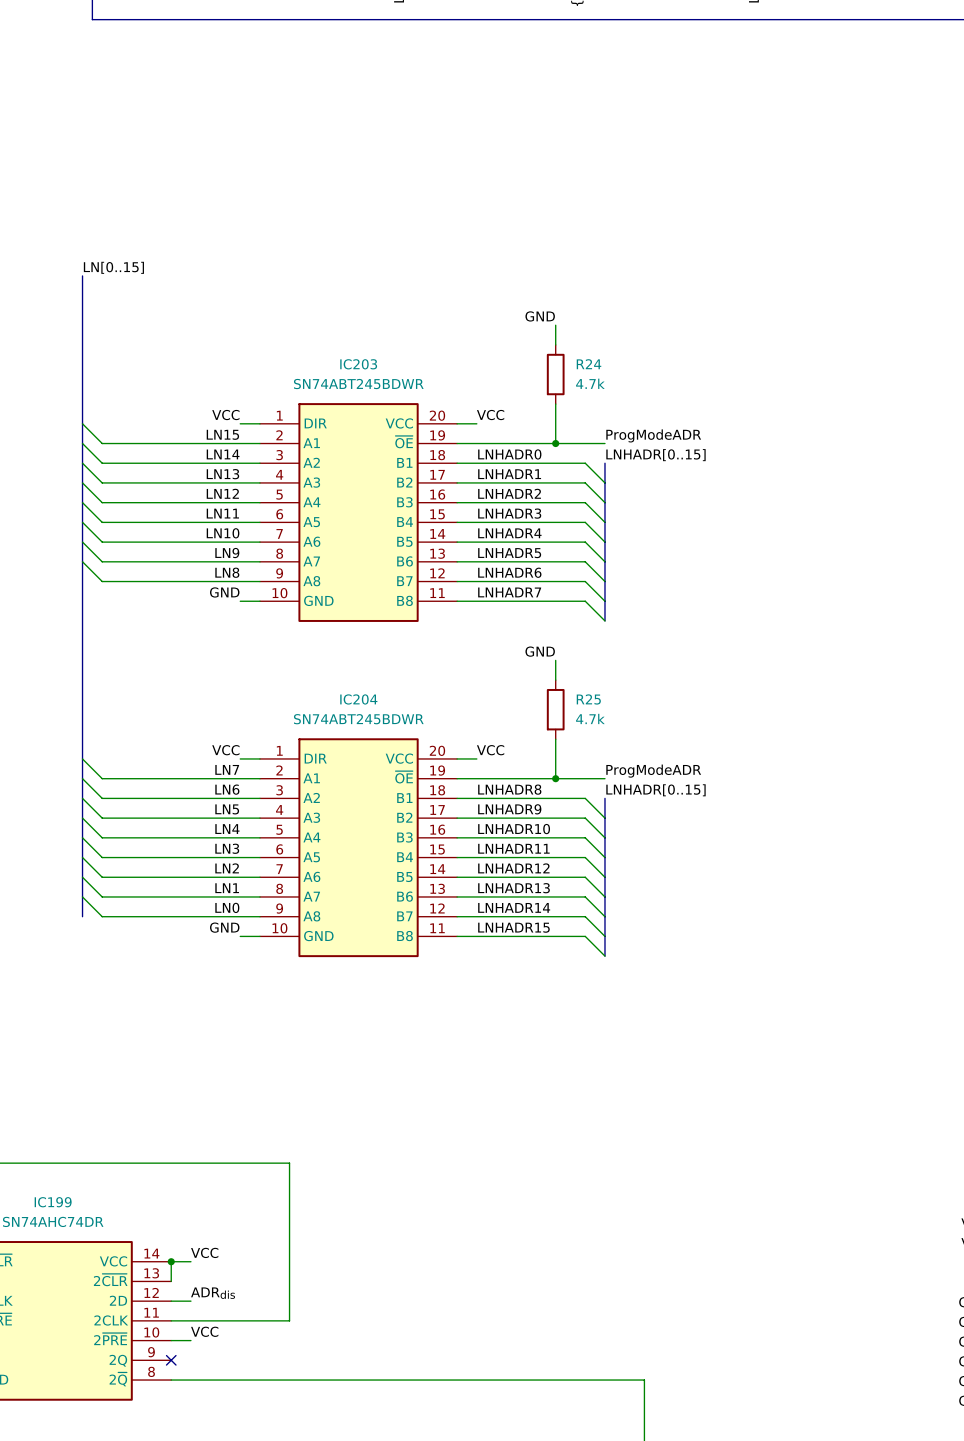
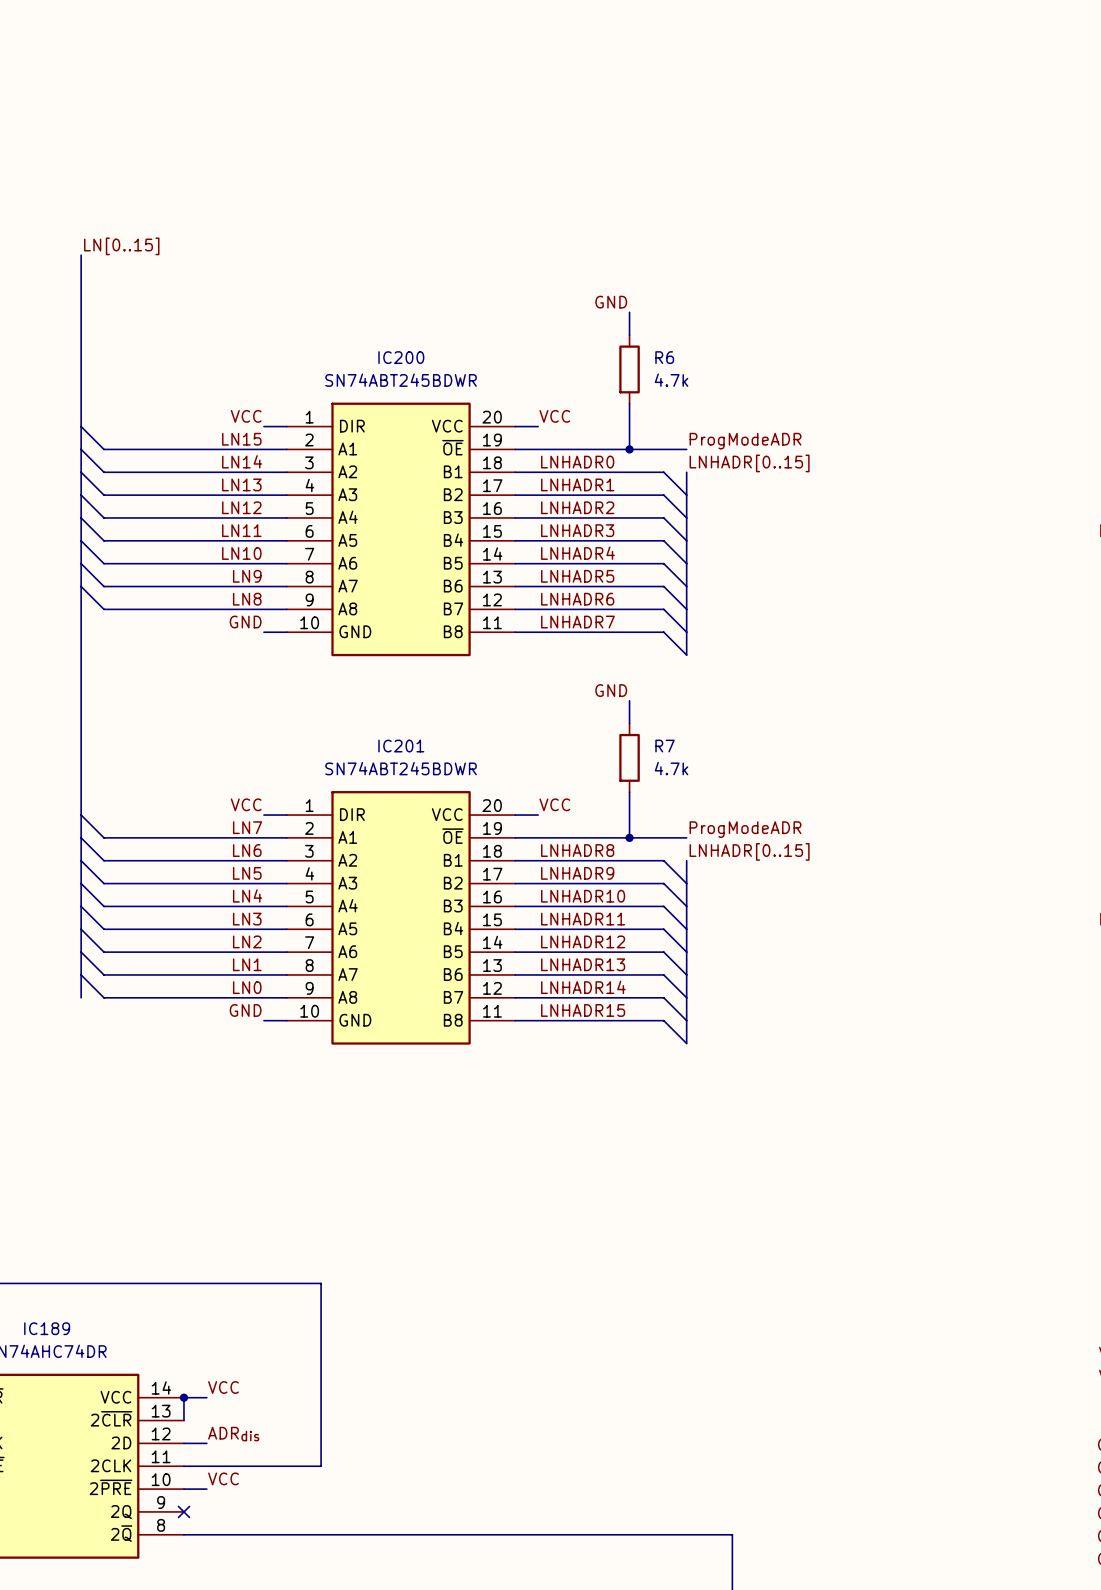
IC203 name: IC203 (358, 364) -> IC200 (401, 357)
R24 name: R24 (589, 364) -> R6 (664, 357)
IC204 name: IC204 (358, 699) -> IC201 (401, 746)
R25 name: R25 (588, 699) -> R7 (664, 746)
IC199 name: IC199 (53, 1202) -> IC189 (47, 1328)

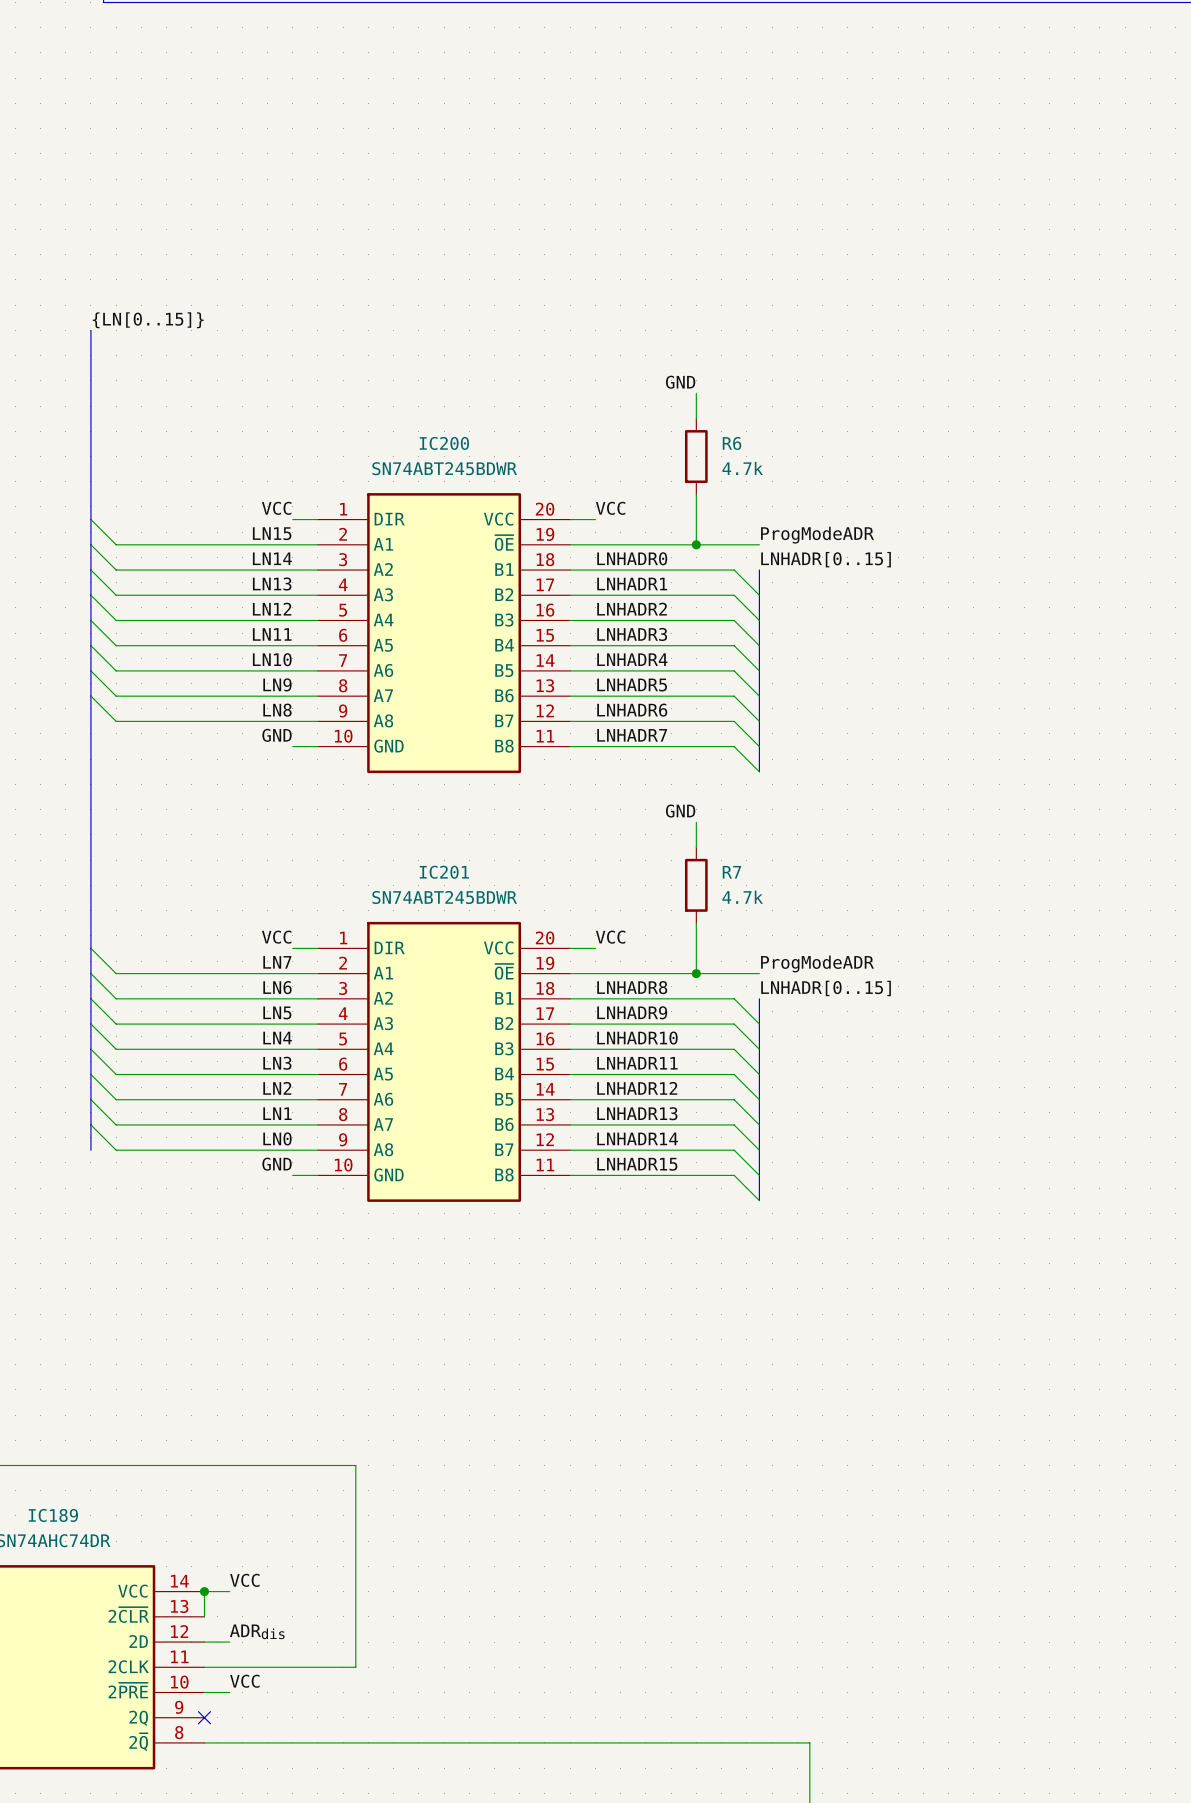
label: LN[0..15] (121, 246) -> {LN[0..15]} (148, 320)

